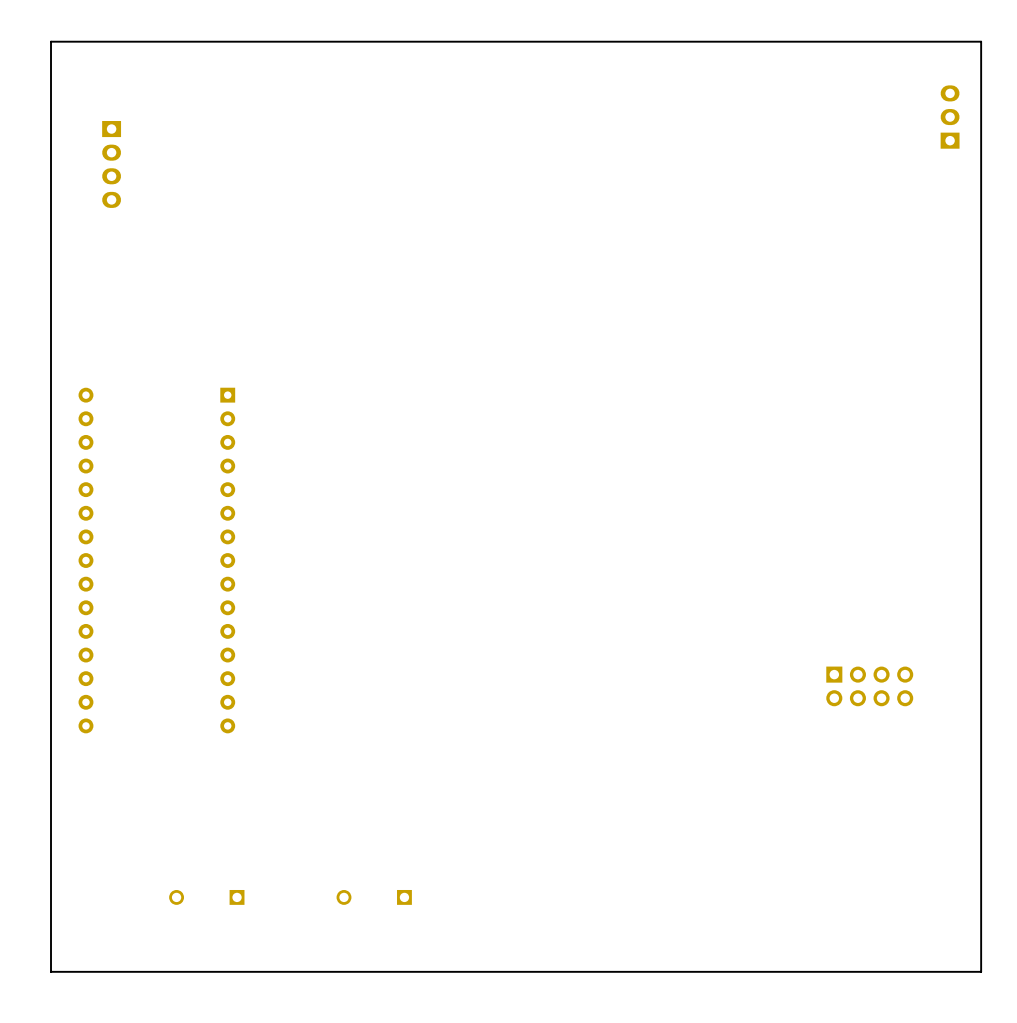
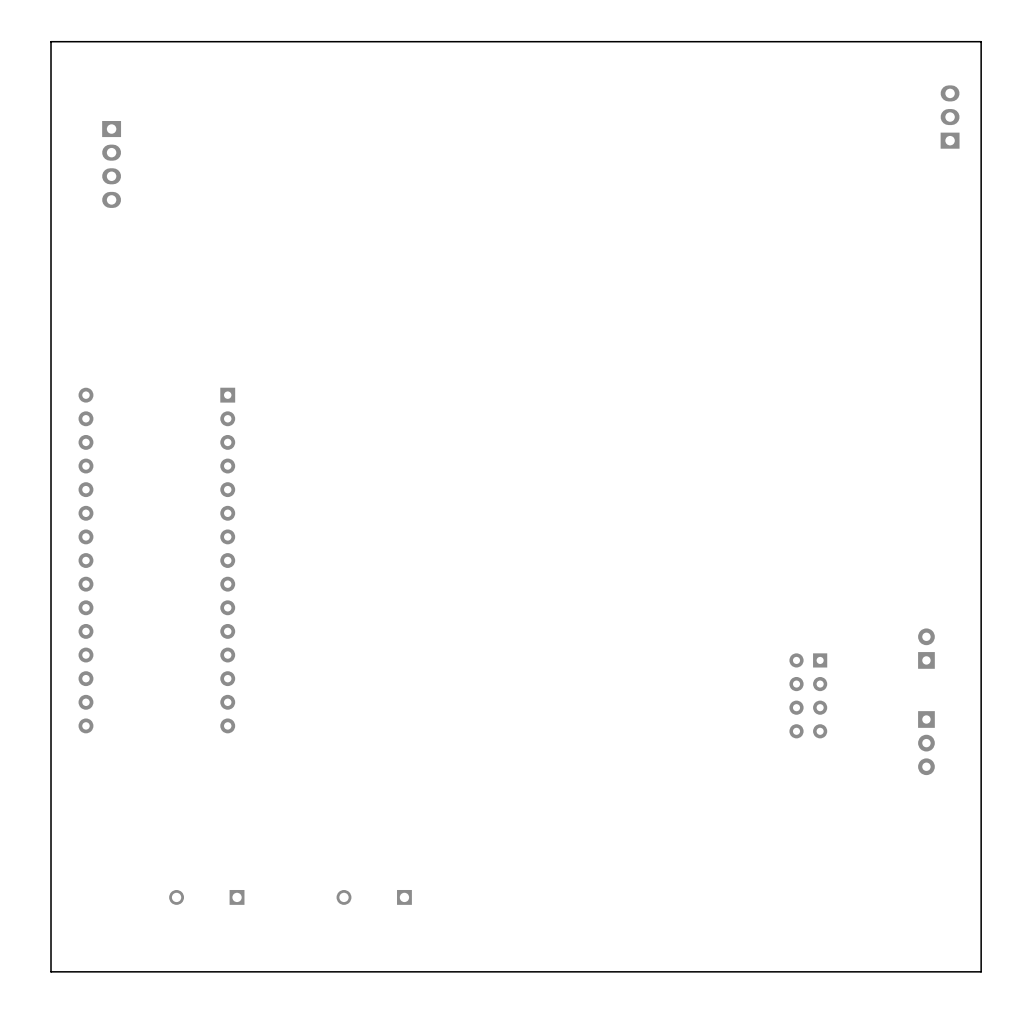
part: none -> (926, 648)
part: (869, 686) -> none
part: none -> (808, 695)
part: none -> (926, 743)

